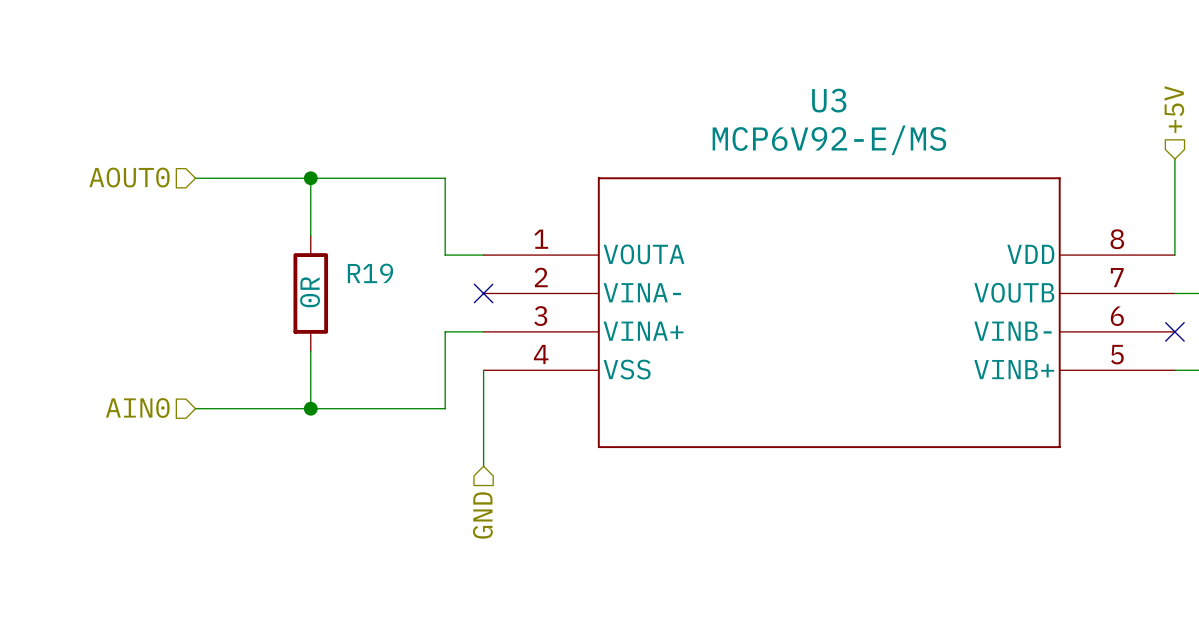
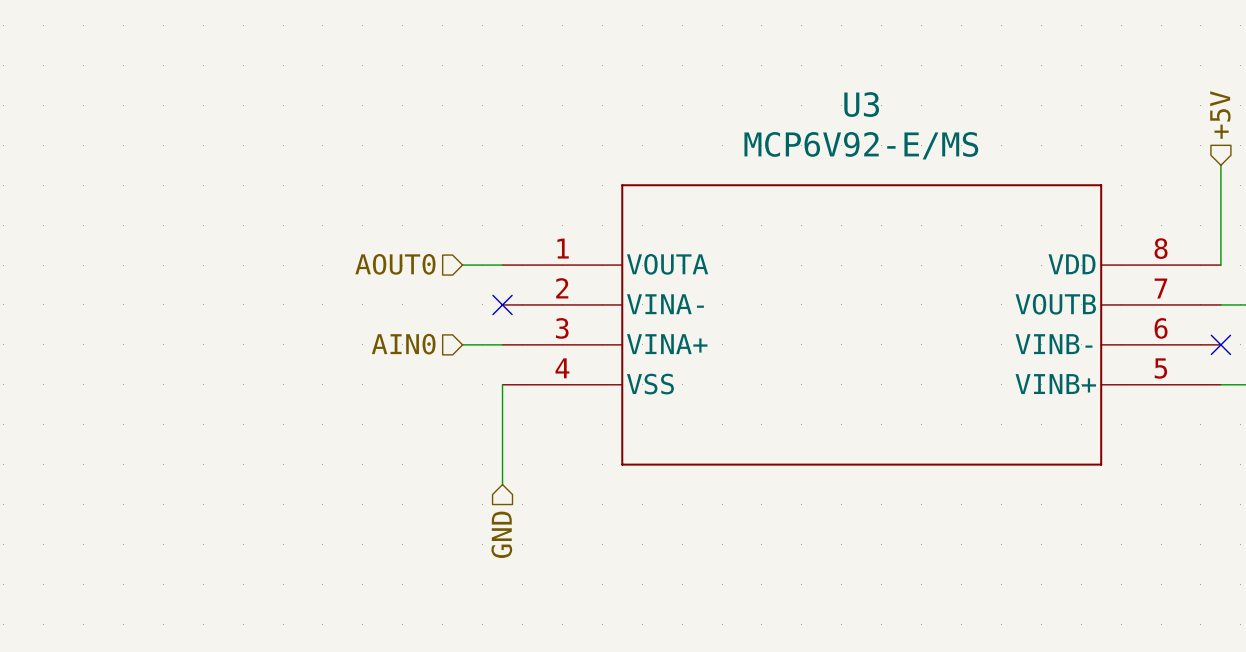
hierarchical label position: AOUT0 (129, 177) -> AOUT0 (395, 264)
wire: (195, 178) (445, 178) (445, 255) -> none
wire: (310, 178) (310, 235) -> none
junction: (310, 178) -> none
R19: 0R (310, 293) -> none
wire: (445, 331) (445, 408) (195, 408) -> none
wire: (310, 351) (310, 408) -> none
hierarchical label position: AIN0 (137, 407) -> AIN0 (403, 344)
junction: (310, 408) -> none

